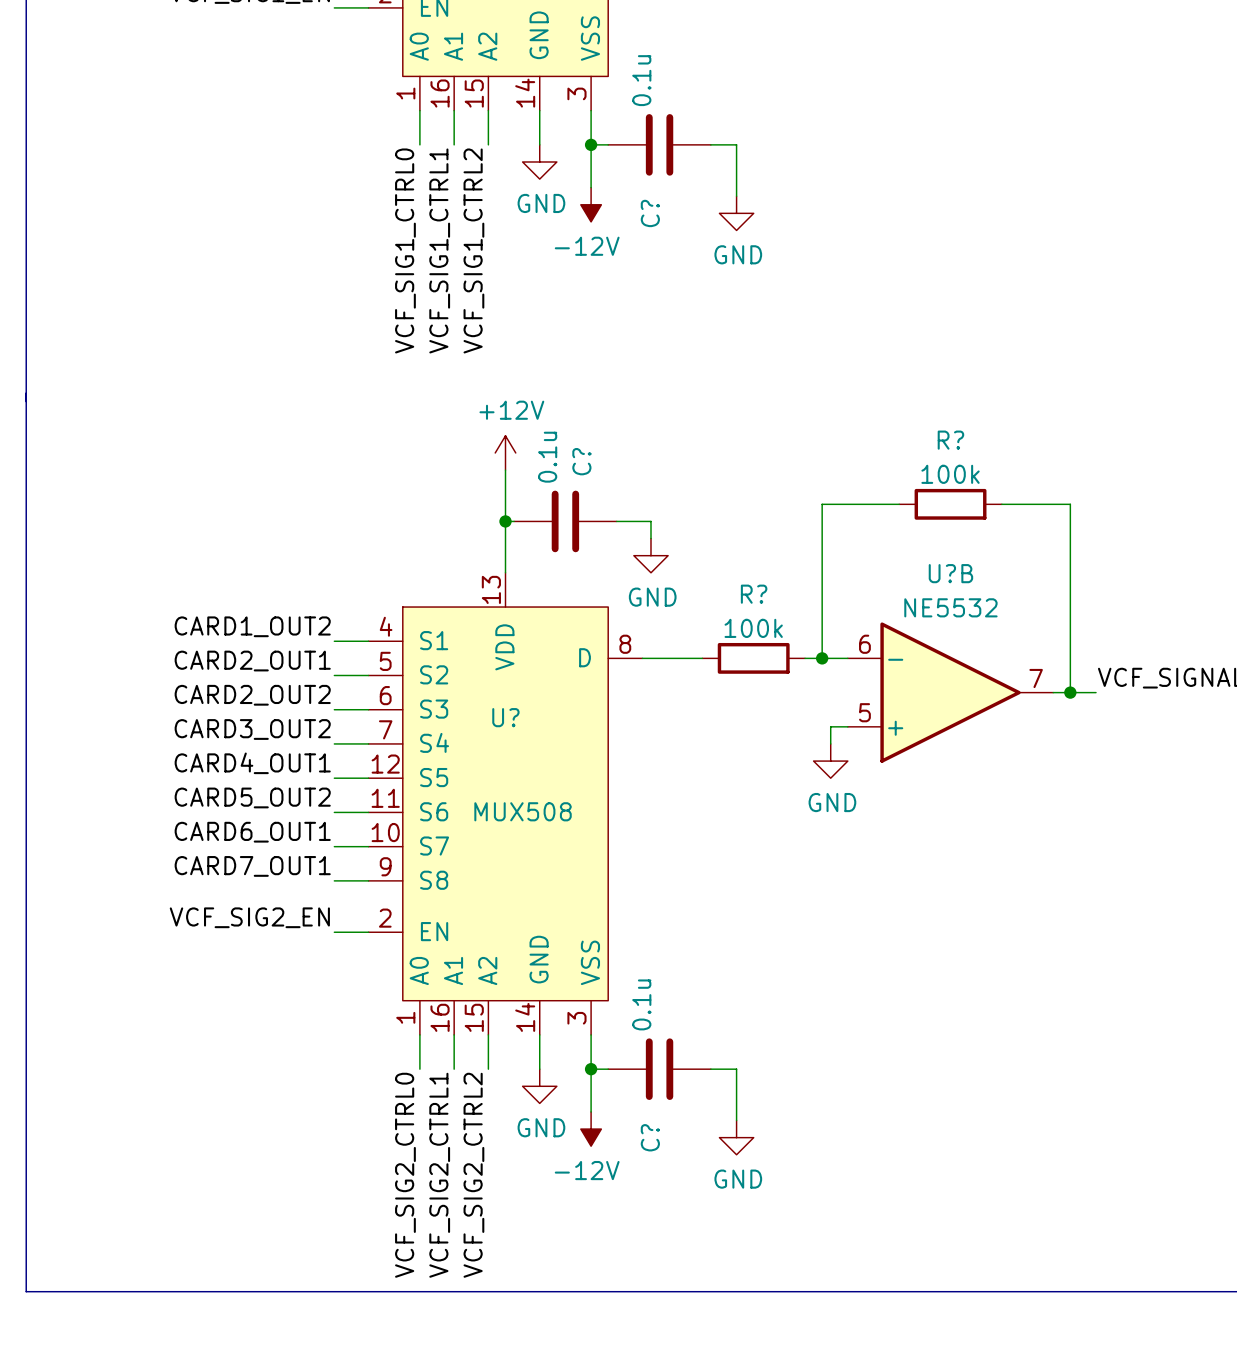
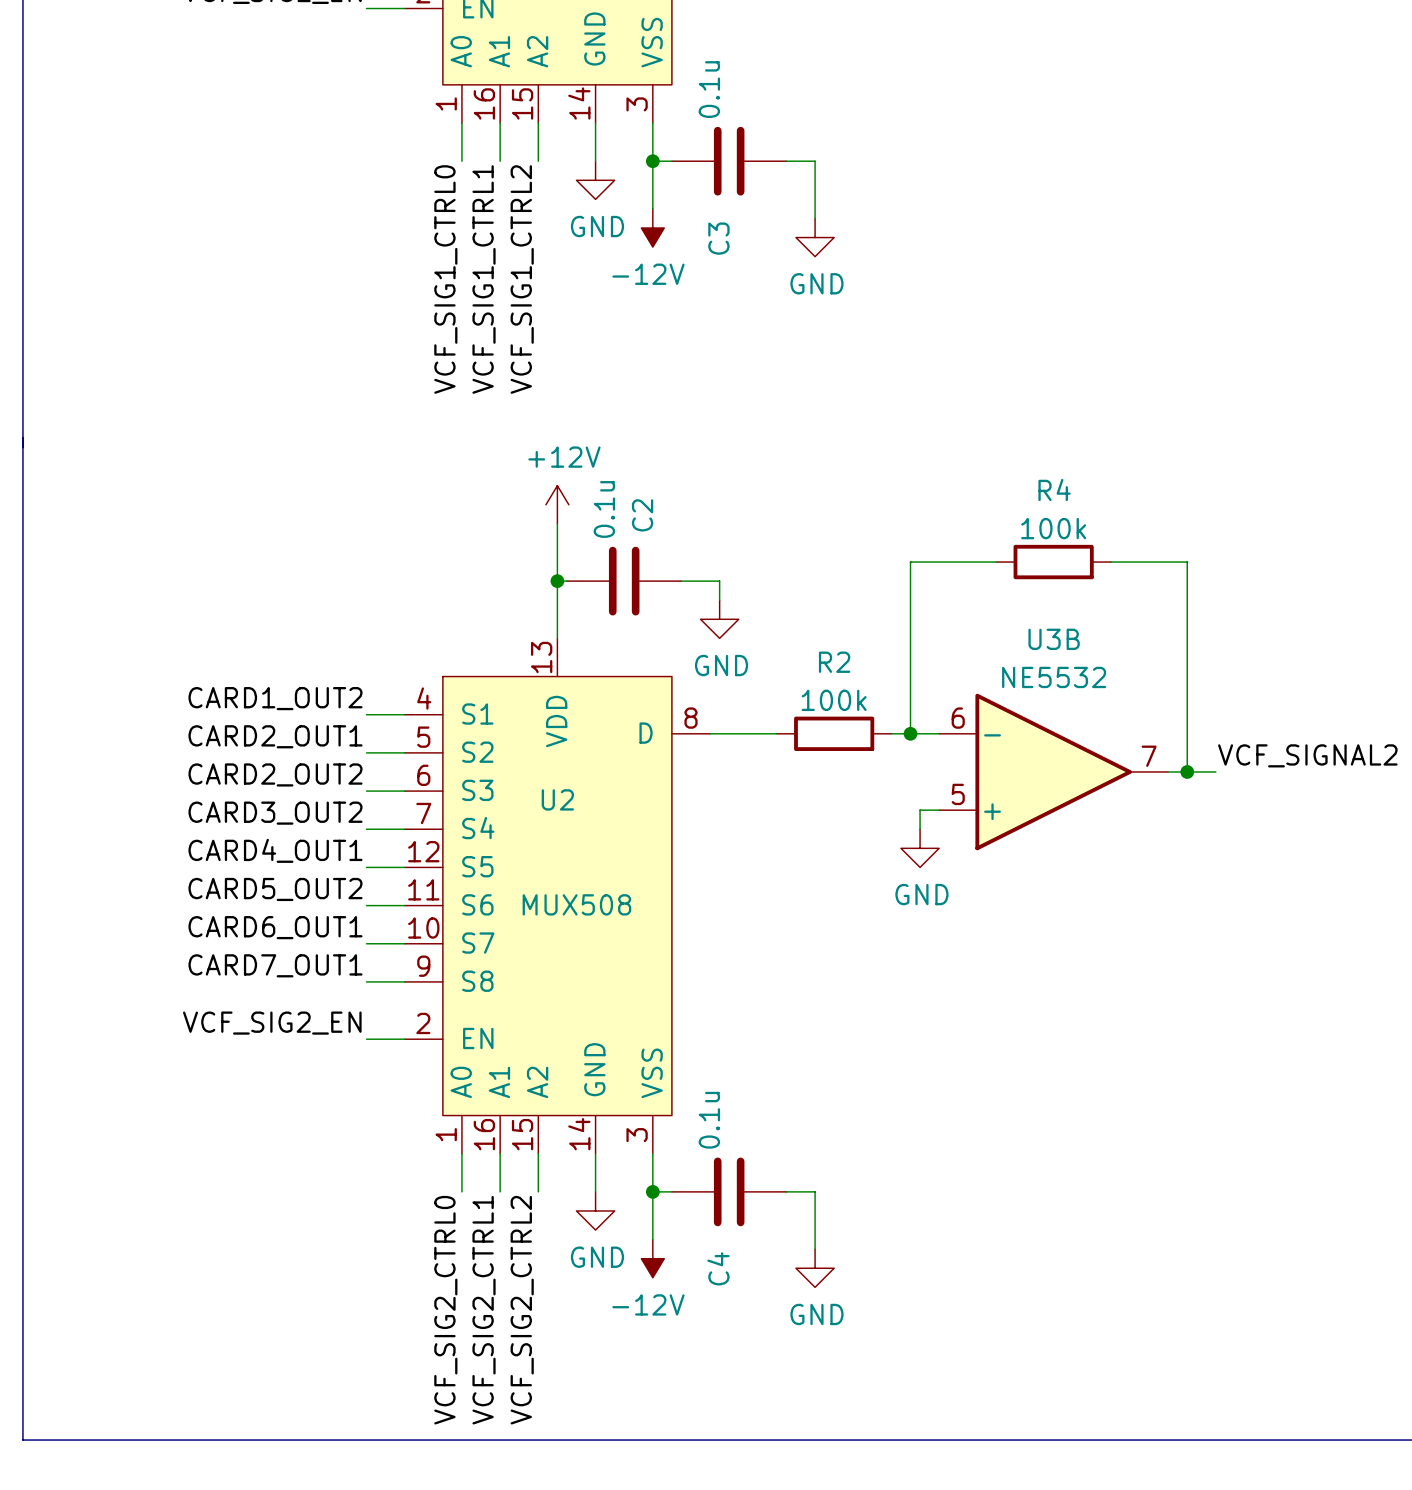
C? name: C? (650, 213) -> C3 (718, 238)
R? name: R? (950, 440) -> R4 (1054, 489)
C? name: C? (581, 461) -> C2 (642, 515)
U?B name: U?B (950, 573) -> U3B (1054, 639)
R? name: R? (754, 594) -> R2 (834, 662)
U? name: U? (505, 717) -> U2 (557, 799)
C? name: C? (650, 1137) -> C4 (718, 1268)

